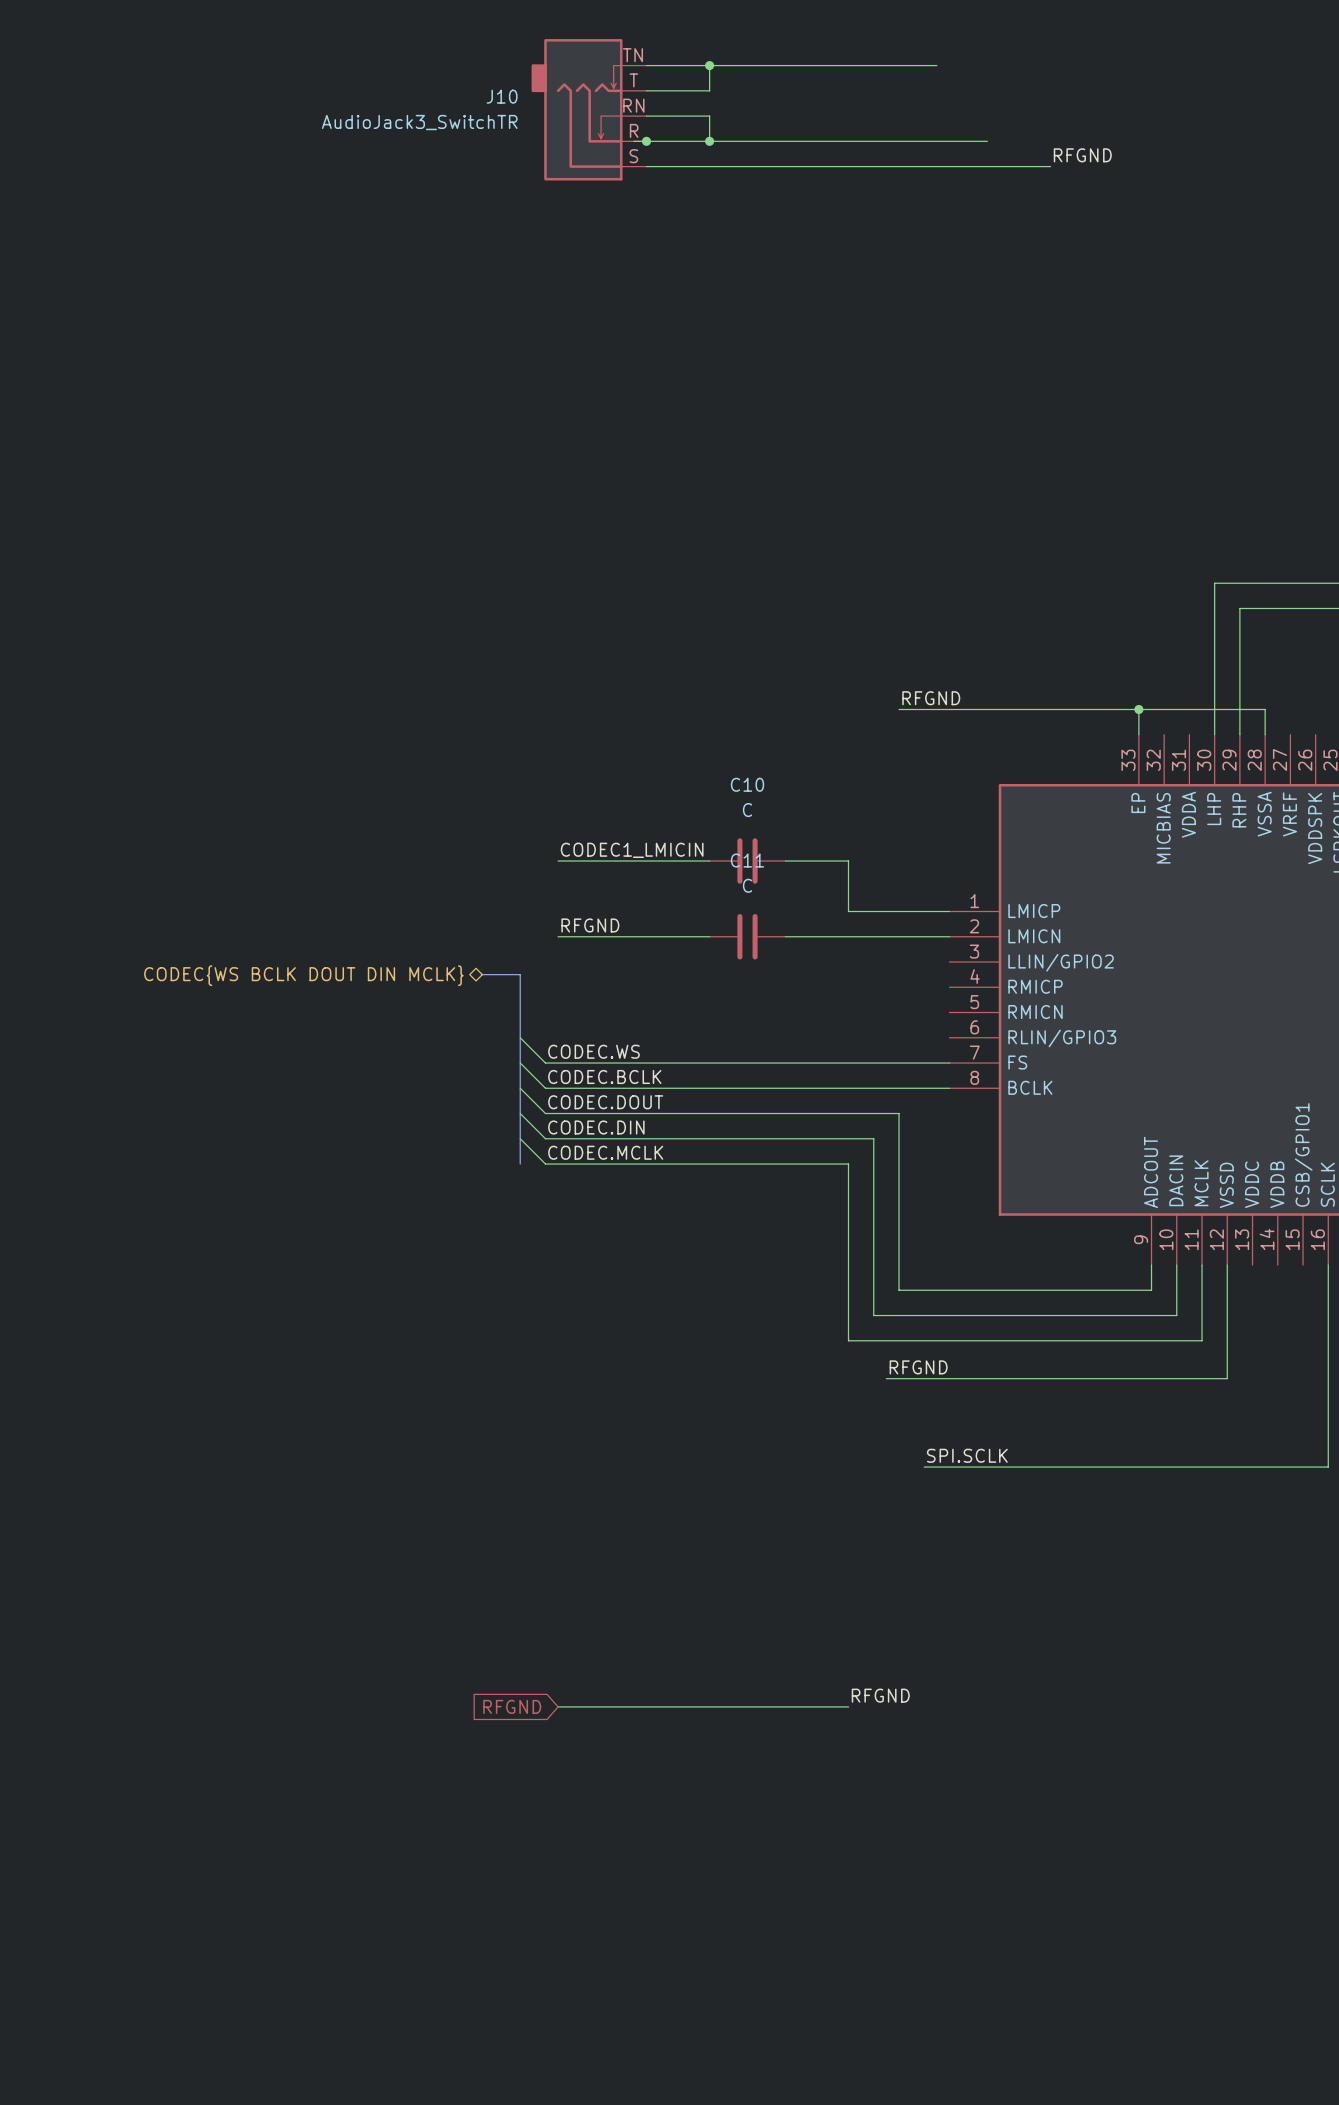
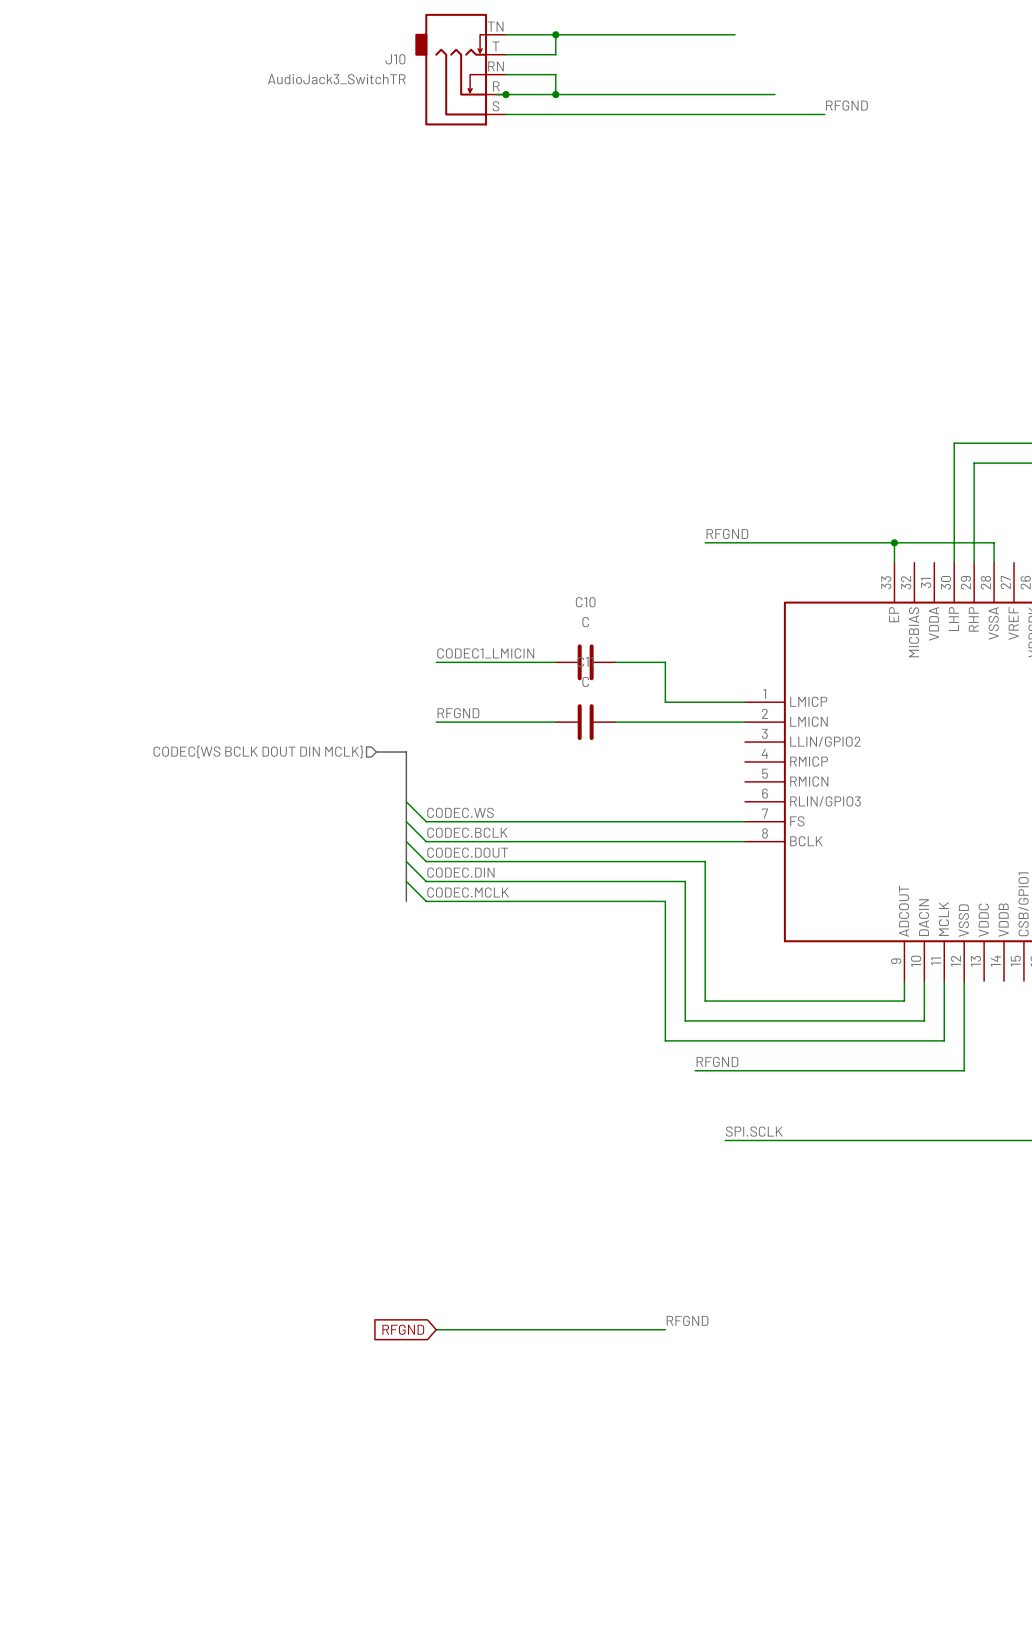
hierarchical label shape: bidirectional (303, 975) -> input (258, 751)

